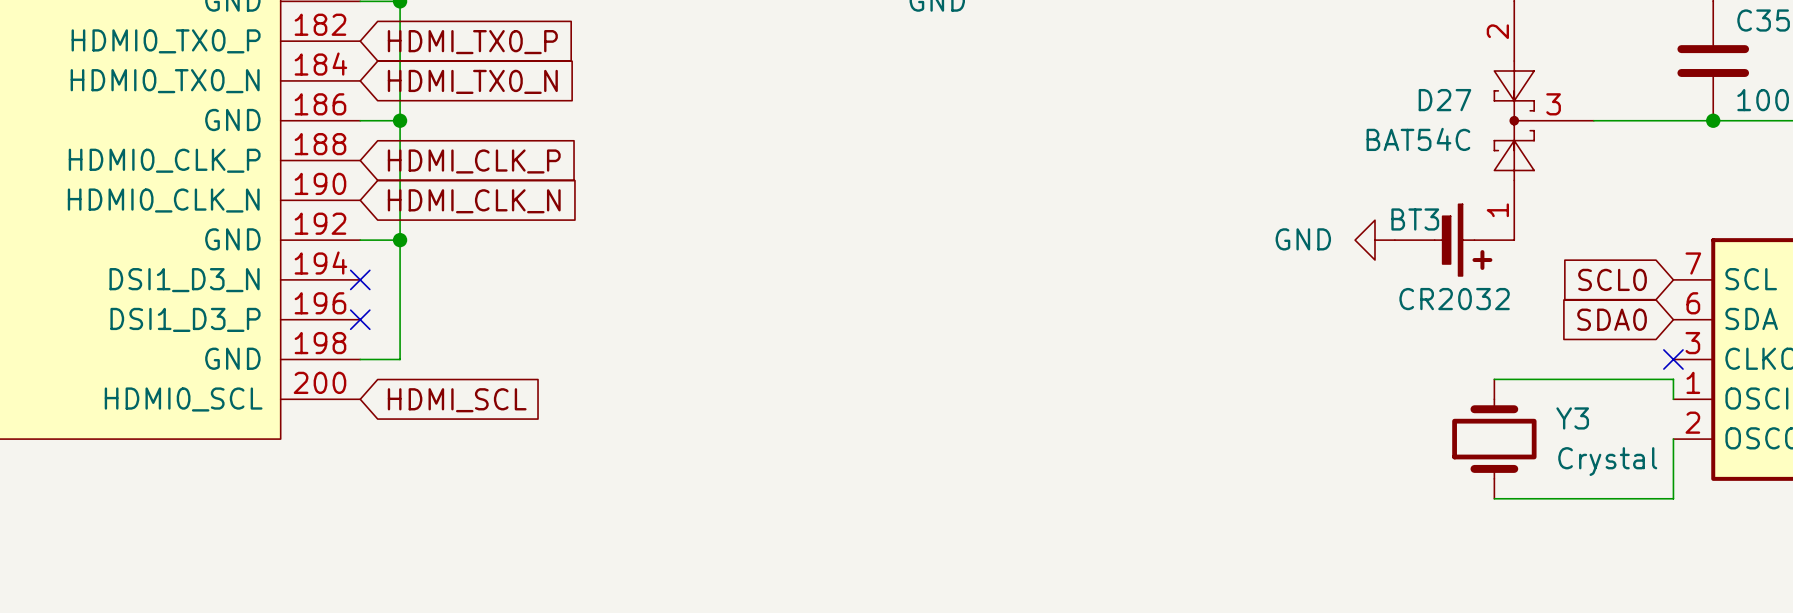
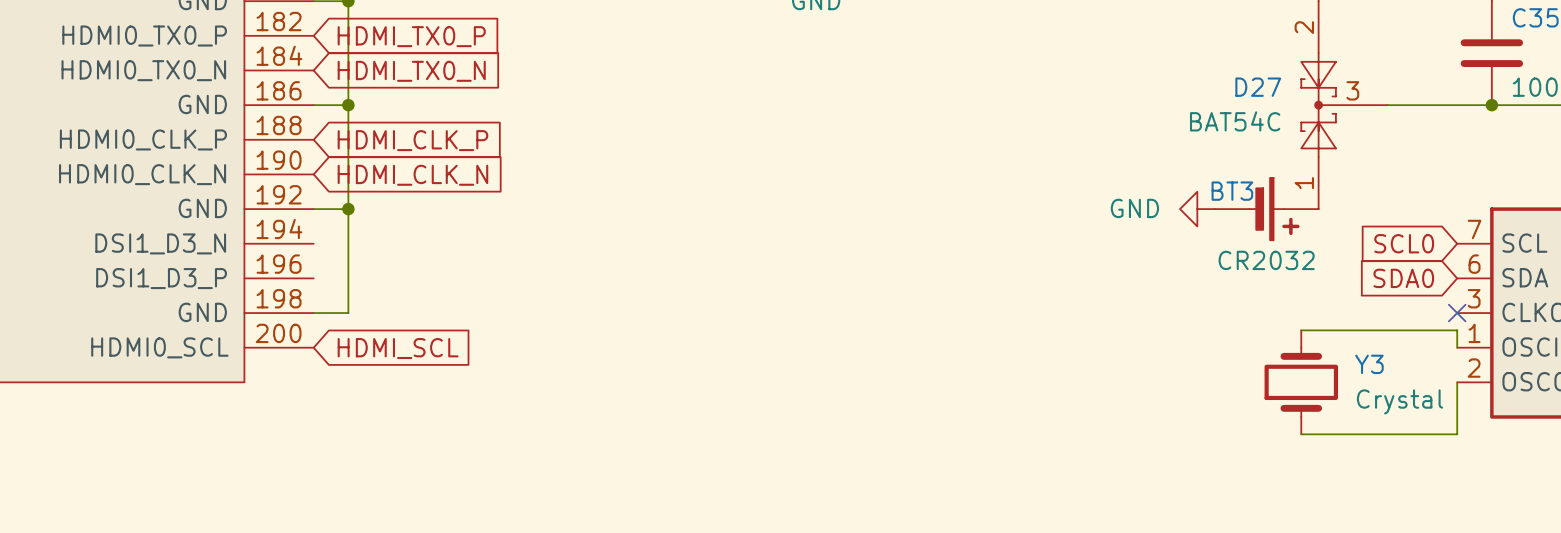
no-connect mark: (360, 279) -> none
no-connect mark: (360, 319) -> none

